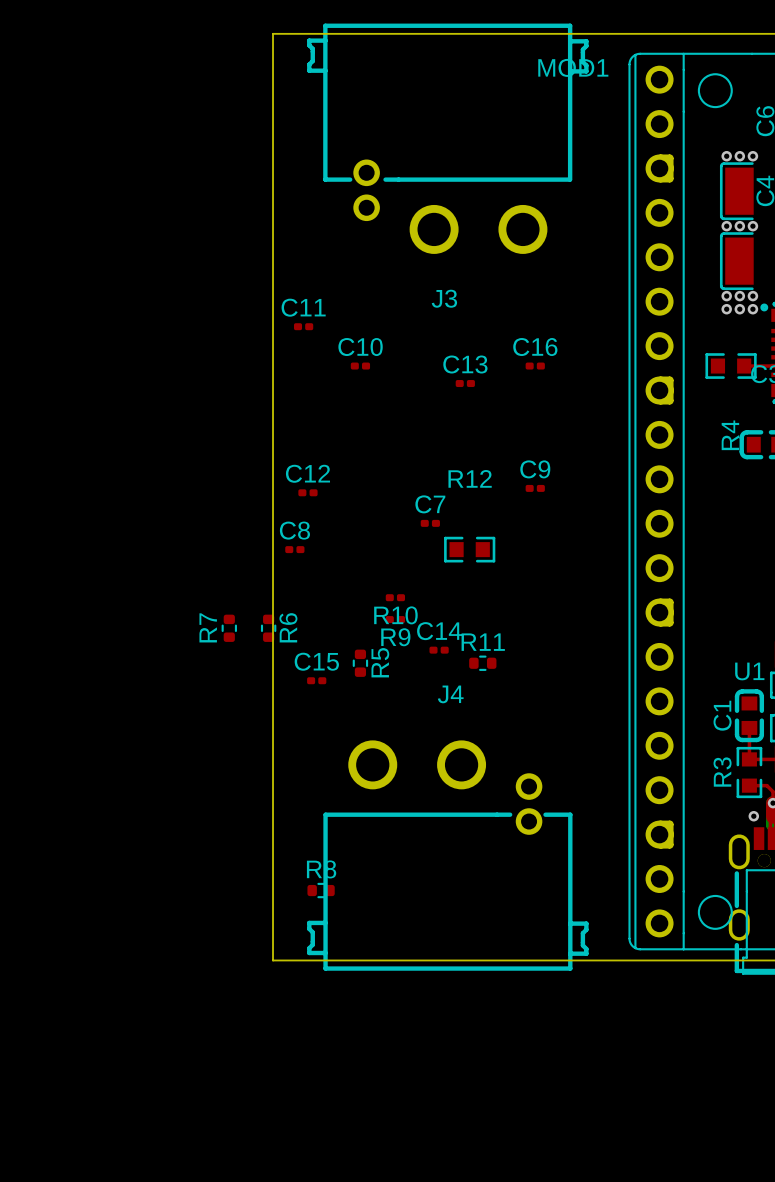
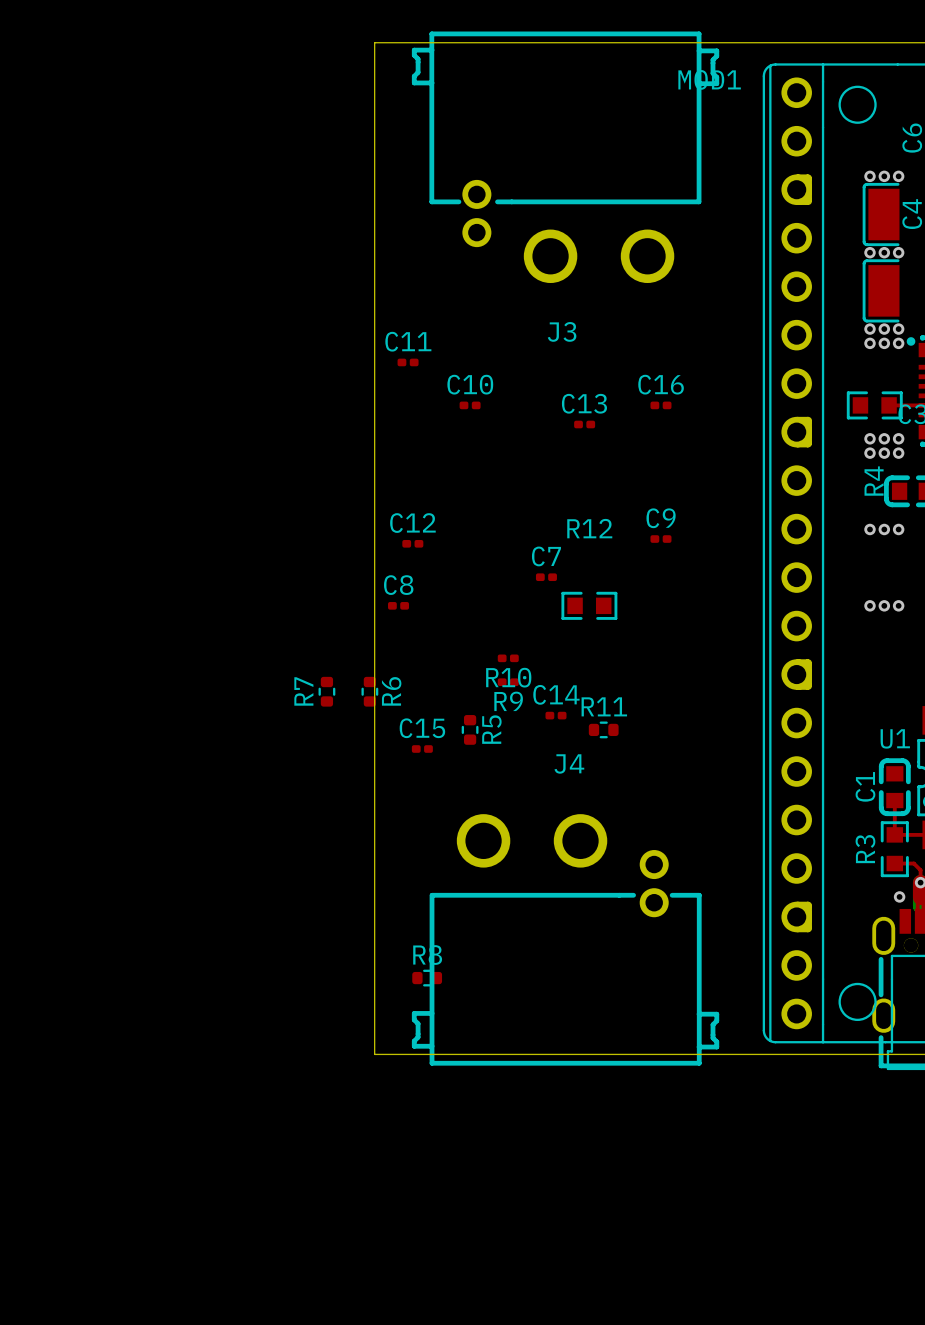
via: none -> (870, 438)
via: none -> (884, 438)
via: none -> (898, 438)
via: none -> (870, 453)
via: none -> (884, 453)
via: none -> (898, 453)
via: none -> (870, 529)
via: none -> (884, 529)
via: none -> (898, 529)
via: none -> (870, 605)
via: none -> (884, 605)
via: none -> (898, 605)

